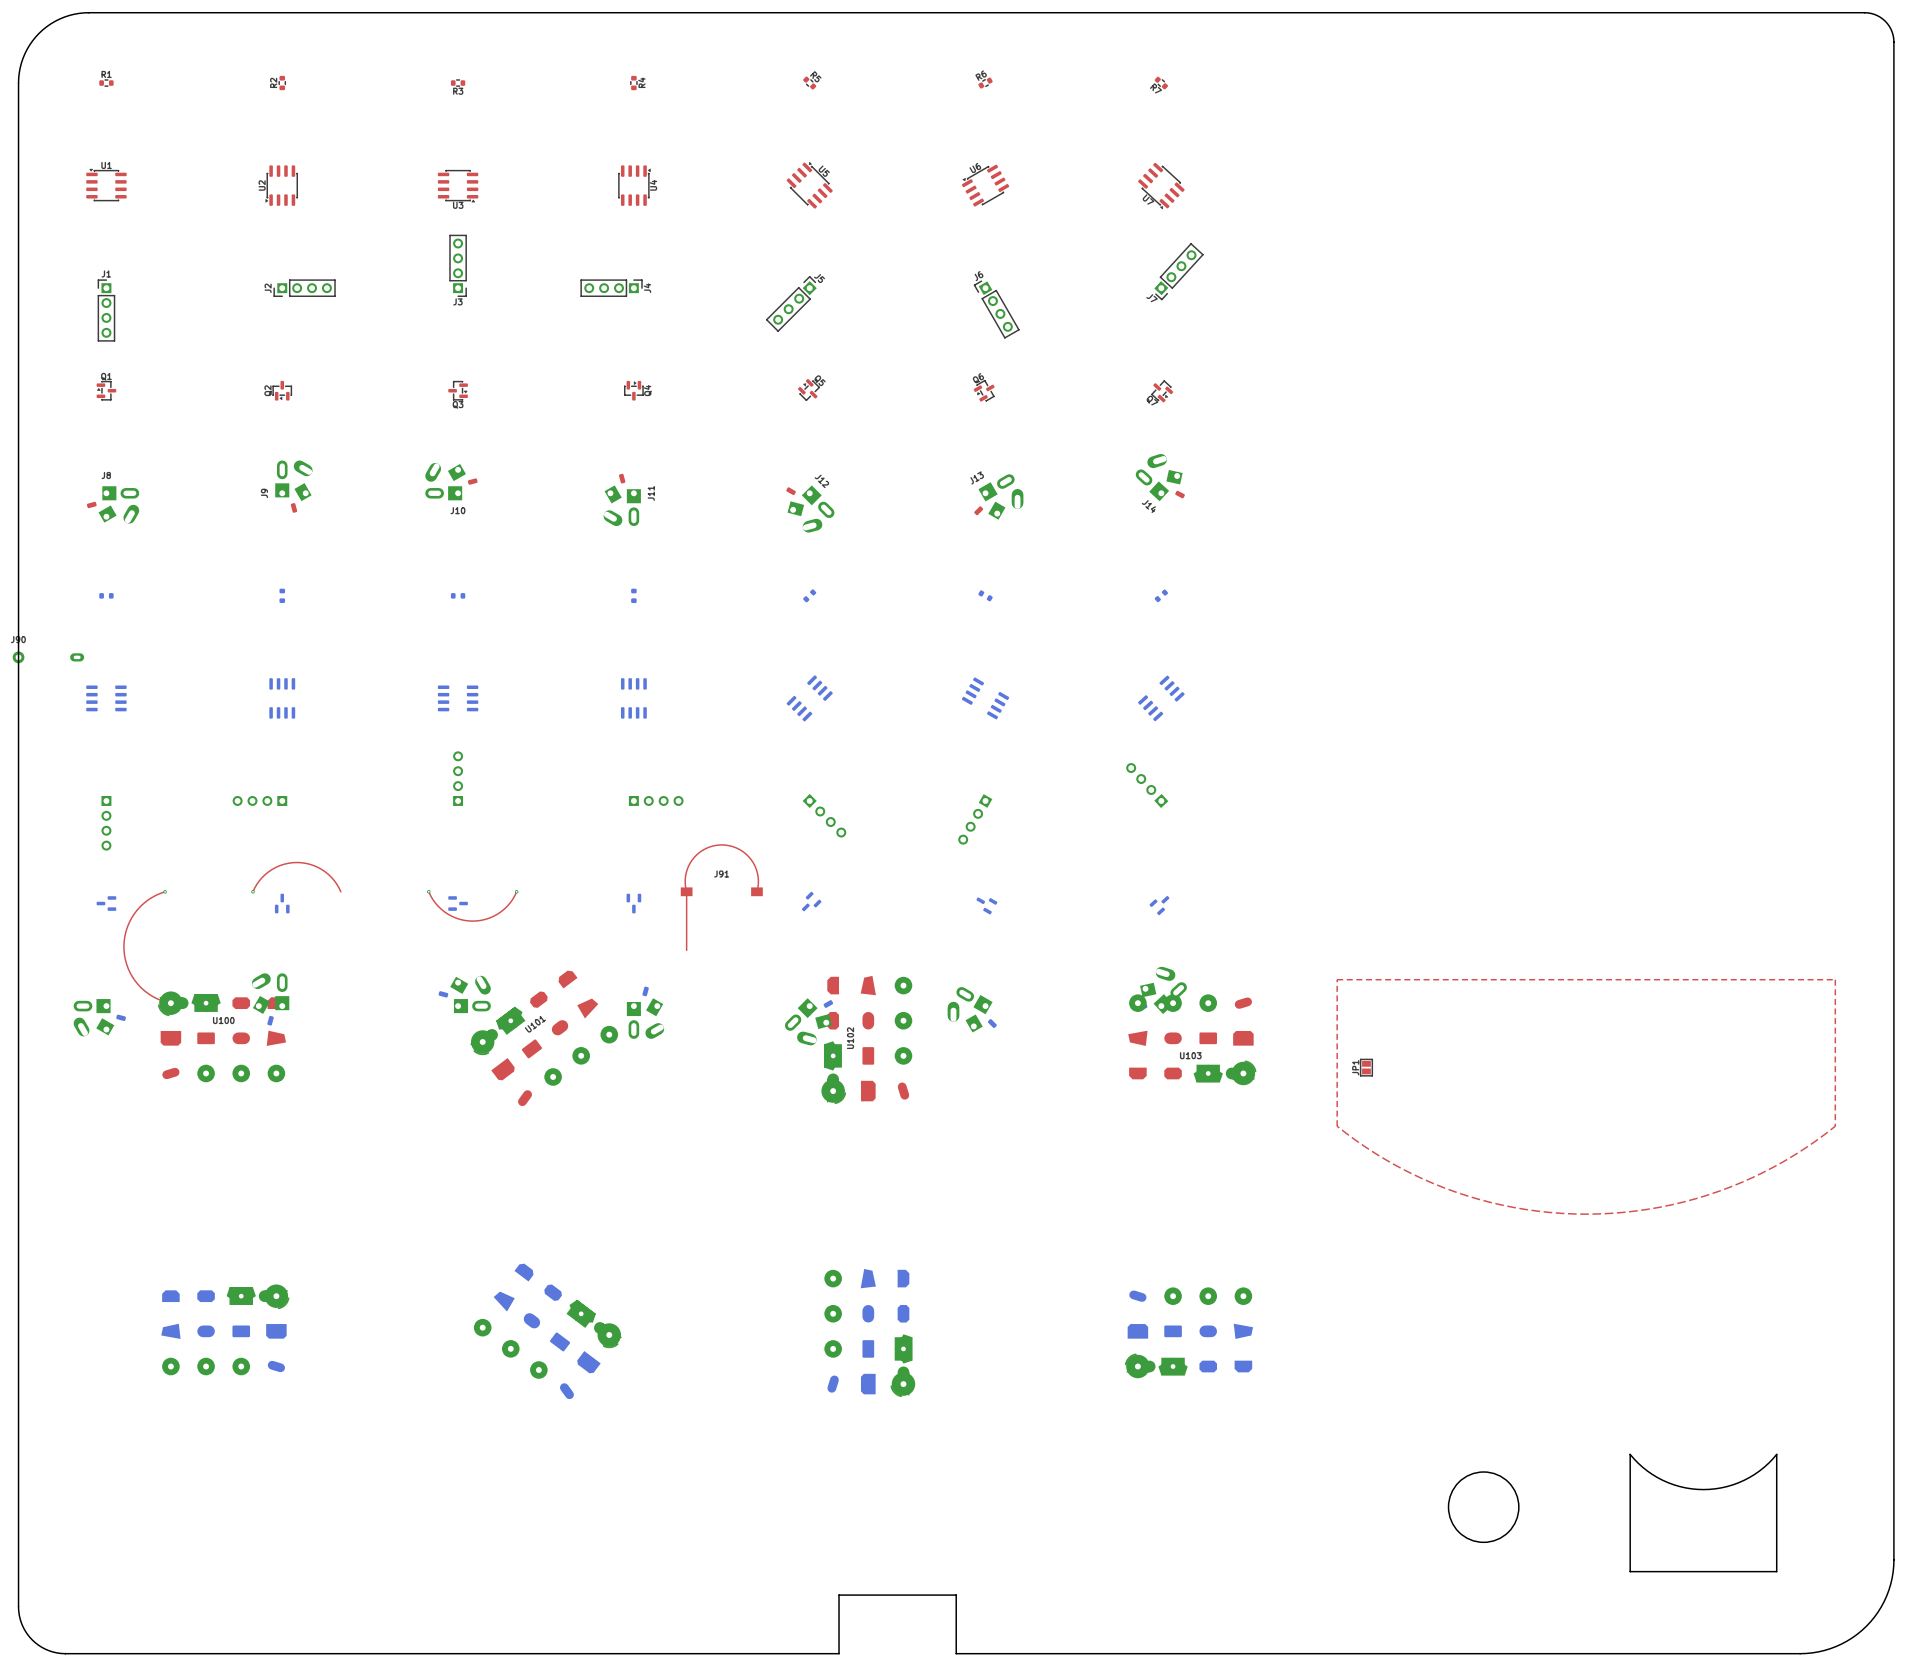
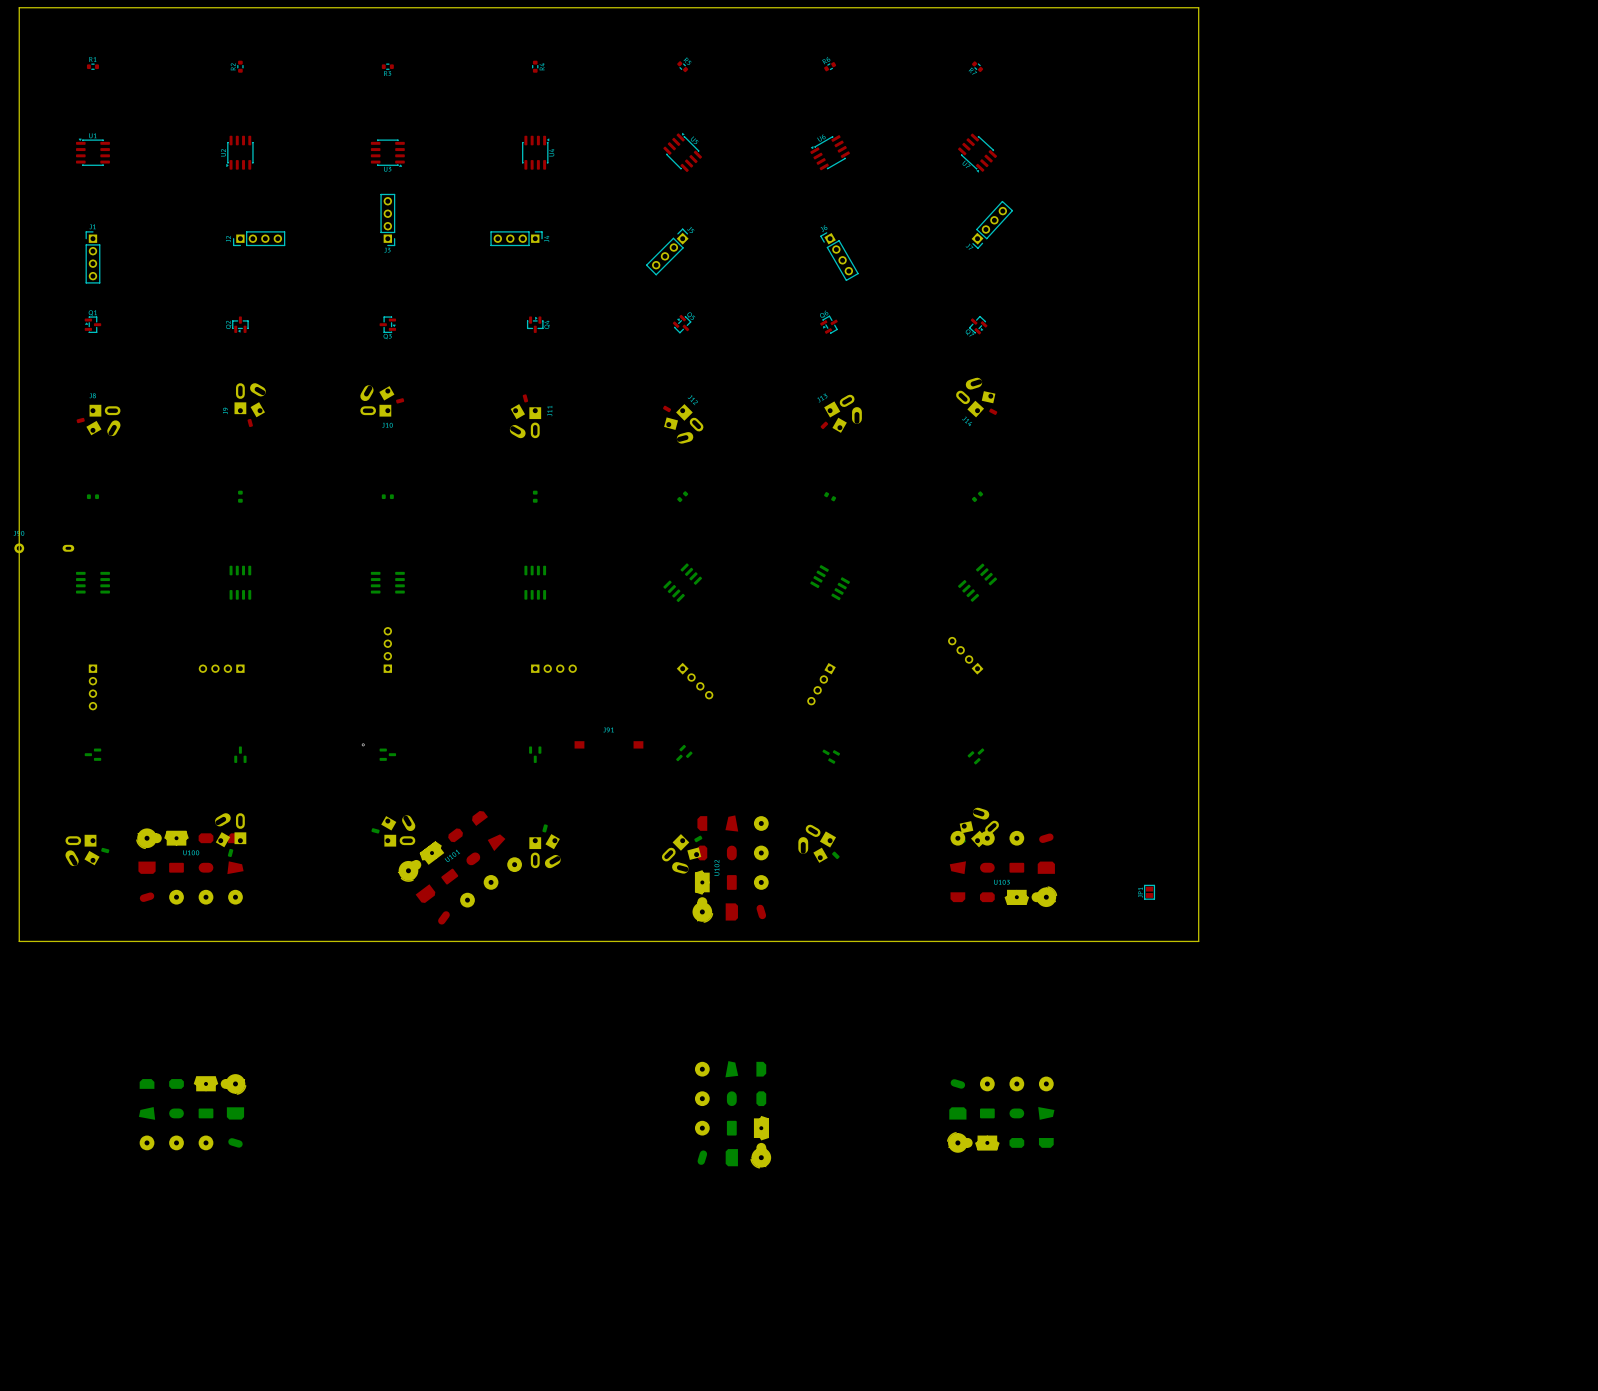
board edge: (88, 12) (73, 14) (59, 19) (39, 33) (24, 53) (20, 68) (18, 83) -> (78, 7) (19, 7) (19, 66)
board edge: (1425, 12) (1864, 12) (1874, 14) (1882, 19) (1889, 26) (1893, 35) (1893, 1559) (1890, 1584) (1884, 1601) (1870, 1621) (1857, 1634) (1830, 1648) (1800, 1653) (956, 1653) (956, 1595) (839, 1595) (839, 1653) (65, 1653) (53, 1652) (41, 1647) (29, 1636) (21, 1622) (18, 1610) (18, 1126) -> (1198, 7) (1198, 941) (19, 941)
top track: (165, 891) (147, 900) (134, 913) (126, 930) (123, 949) (128, 968) (138, 984) (152, 996) (170, 1003) -> none
via: (165, 891) -> none
top track: (252, 891) (259, 880) (272, 869) (284, 864) (296, 862) (309, 864) (321, 869) (334, 880) (340, 891) -> none
via: (252, 891) -> none
top track: (428, 891) (435, 902) (448, 914) (459, 919) (472, 921) (485, 919) (497, 914) (510, 902) (516, 891) -> none
via: (516, 891) -> none
top track: (756, 891) (758, 880) (756, 869) (751, 859) (739, 849) (729, 845) (718, 845) (707, 847) (697, 854) (690, 862) (685, 876) (686, 950) -> none
top zone outline: (1337, 979) (1835, 979) (1835, 1126) (1795, 1154) (1752, 1177) (1706, 1195) (1659, 1207) (1610, 1213) (1574, 1213) (1525, 1209) (1477, 1198) (1442, 1187) (1409, 1172) (1377, 1154) (1337, 1126) (1337, 979) -> none
part: (548, 1331) -> none
board edge: (1630, 1454) (1630, 1571) (1776, 1571) (1776, 1454) (1764, 1467) (1744, 1480) (1721, 1487) (1703, 1489) (1685, 1487) (1662, 1480) (1642, 1467) (1630, 1454) -> none
round board edge: [1448, 1471, 1520, 1543] -> none

